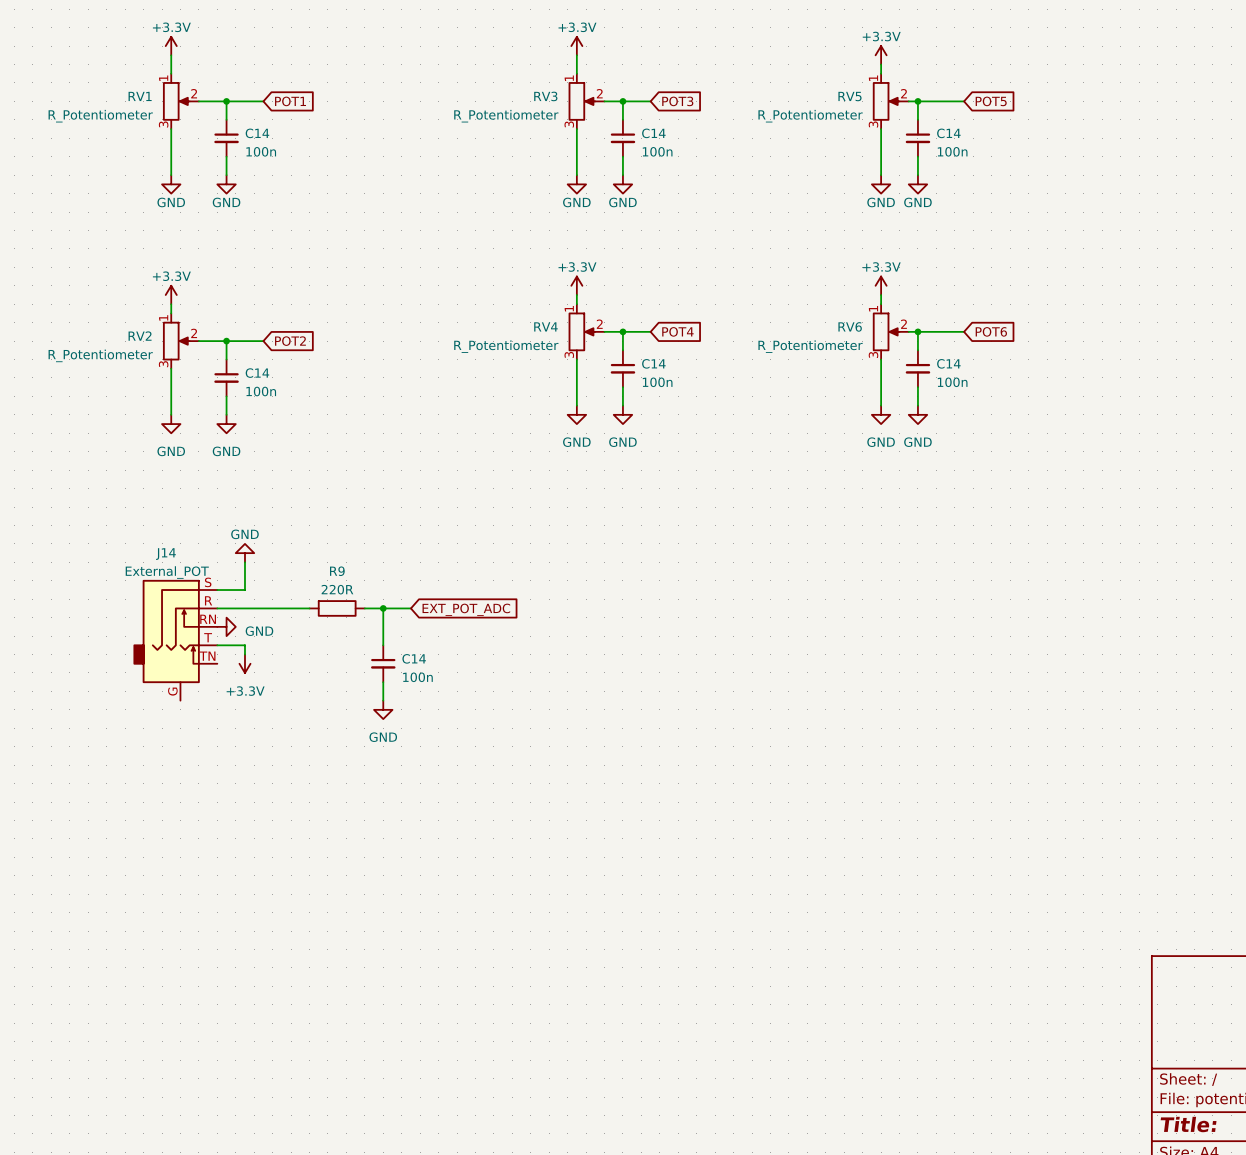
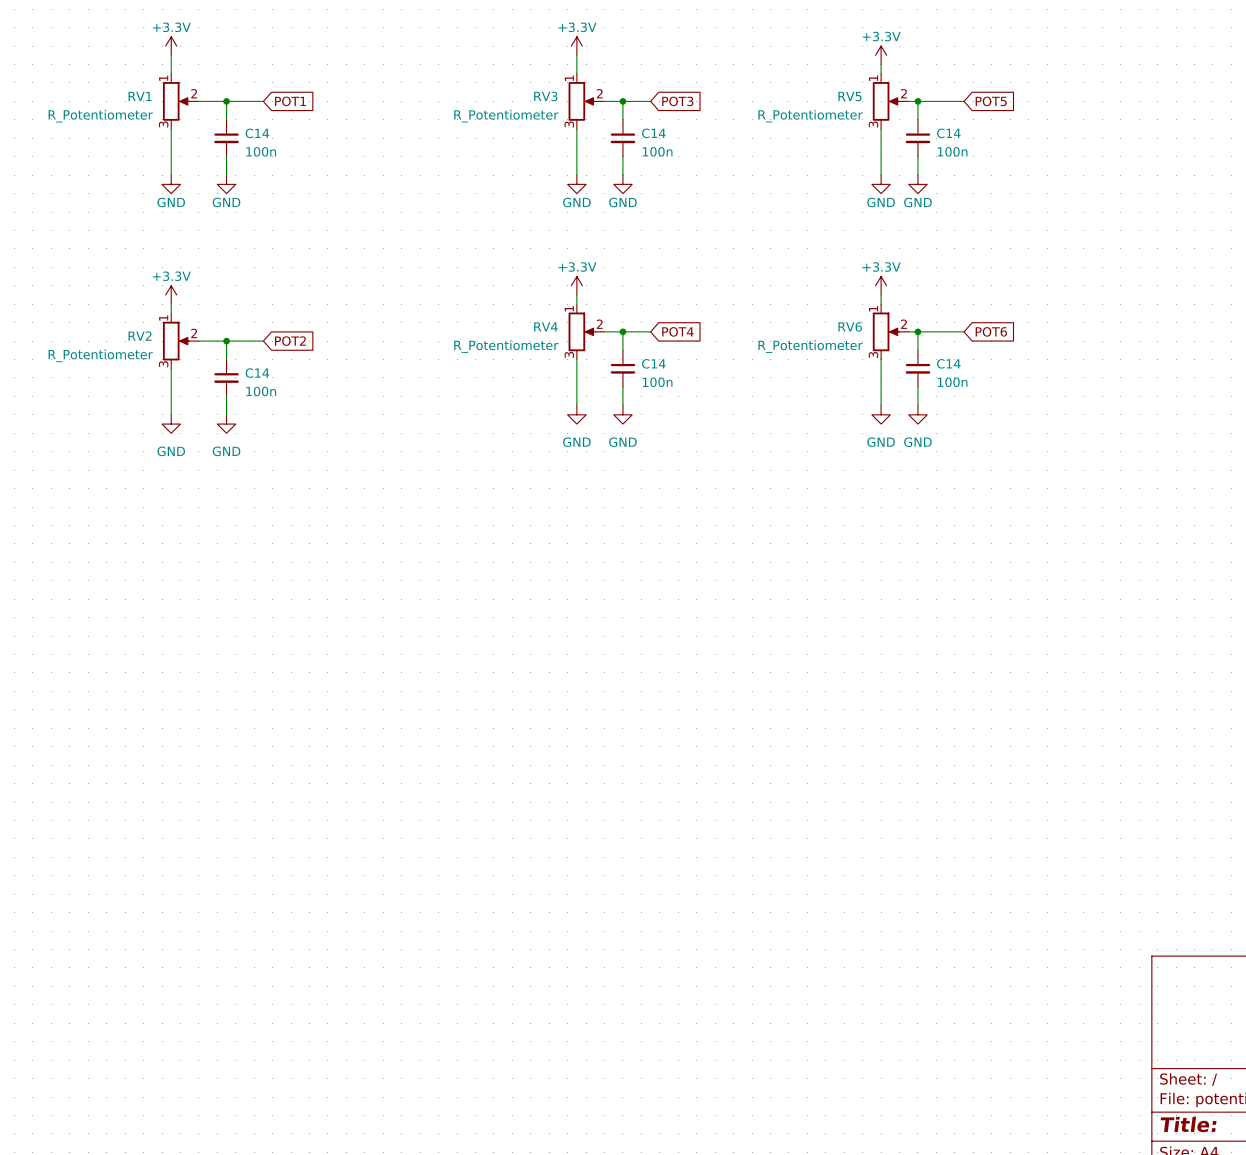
power symbol: GND (244, 553) -> none
wire: (244, 562) (244, 590) (217, 590) -> none
wire: (217, 608) (309, 608) -> none
R9: 220R (337, 608) -> none
wire: (364, 608) (410, 608) -> none
wire: (383, 608) (383, 645) -> none
junction: (383, 608) -> none
global label: EXT_POT_ADC (466, 609) -> none
power symbol: GND (226, 626) -> none
J14: External_POT (175, 640) -> none
wire: (217, 645) (244, 645) (244, 654) -> none
power symbol: +3.3V (244, 663) -> none
C14: 100n (383, 663) -> none
wire: (383, 682) (383, 700) -> none
power symbol: GND (383, 709) -> none

